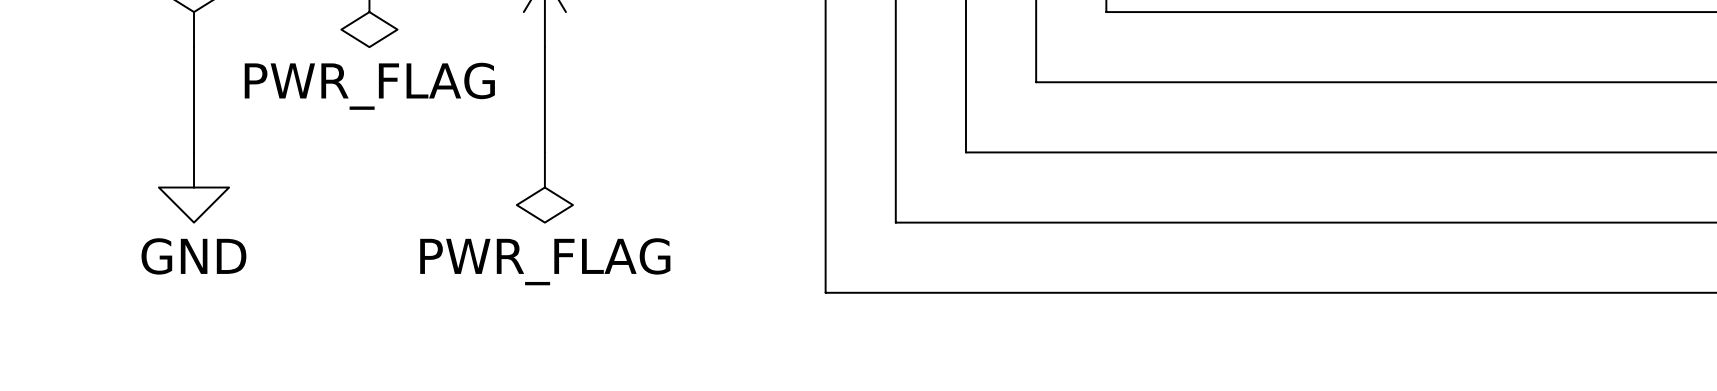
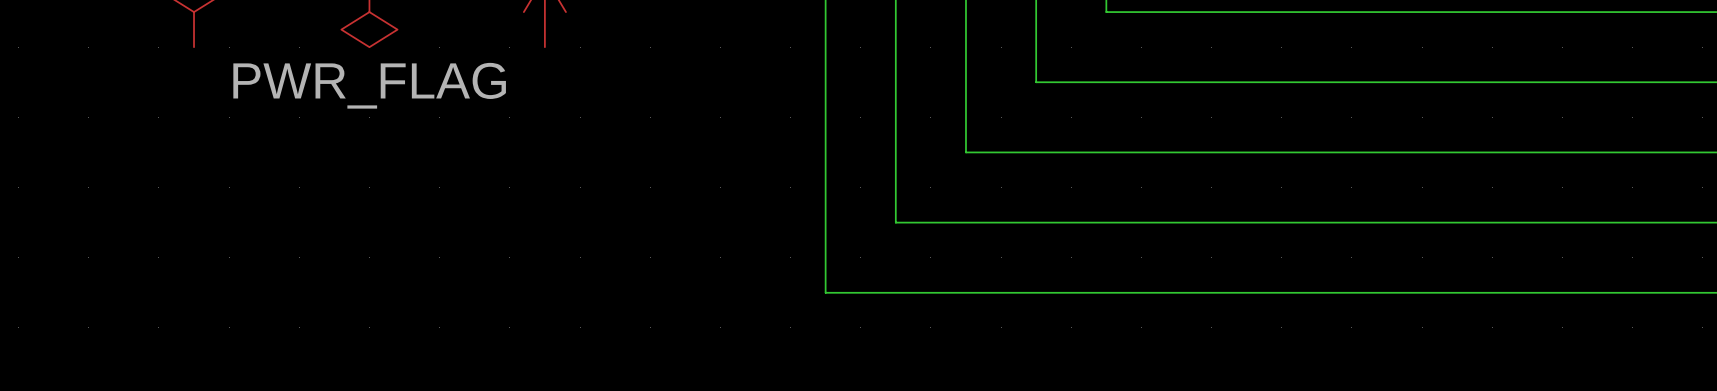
wire: (194, 47) (194, 152) -> none
wire: (544, 47) (544, 152) -> none
power symbol: GND (194, 187) -> none
power symbol: PWR_FLAG (544, 187) -> none

